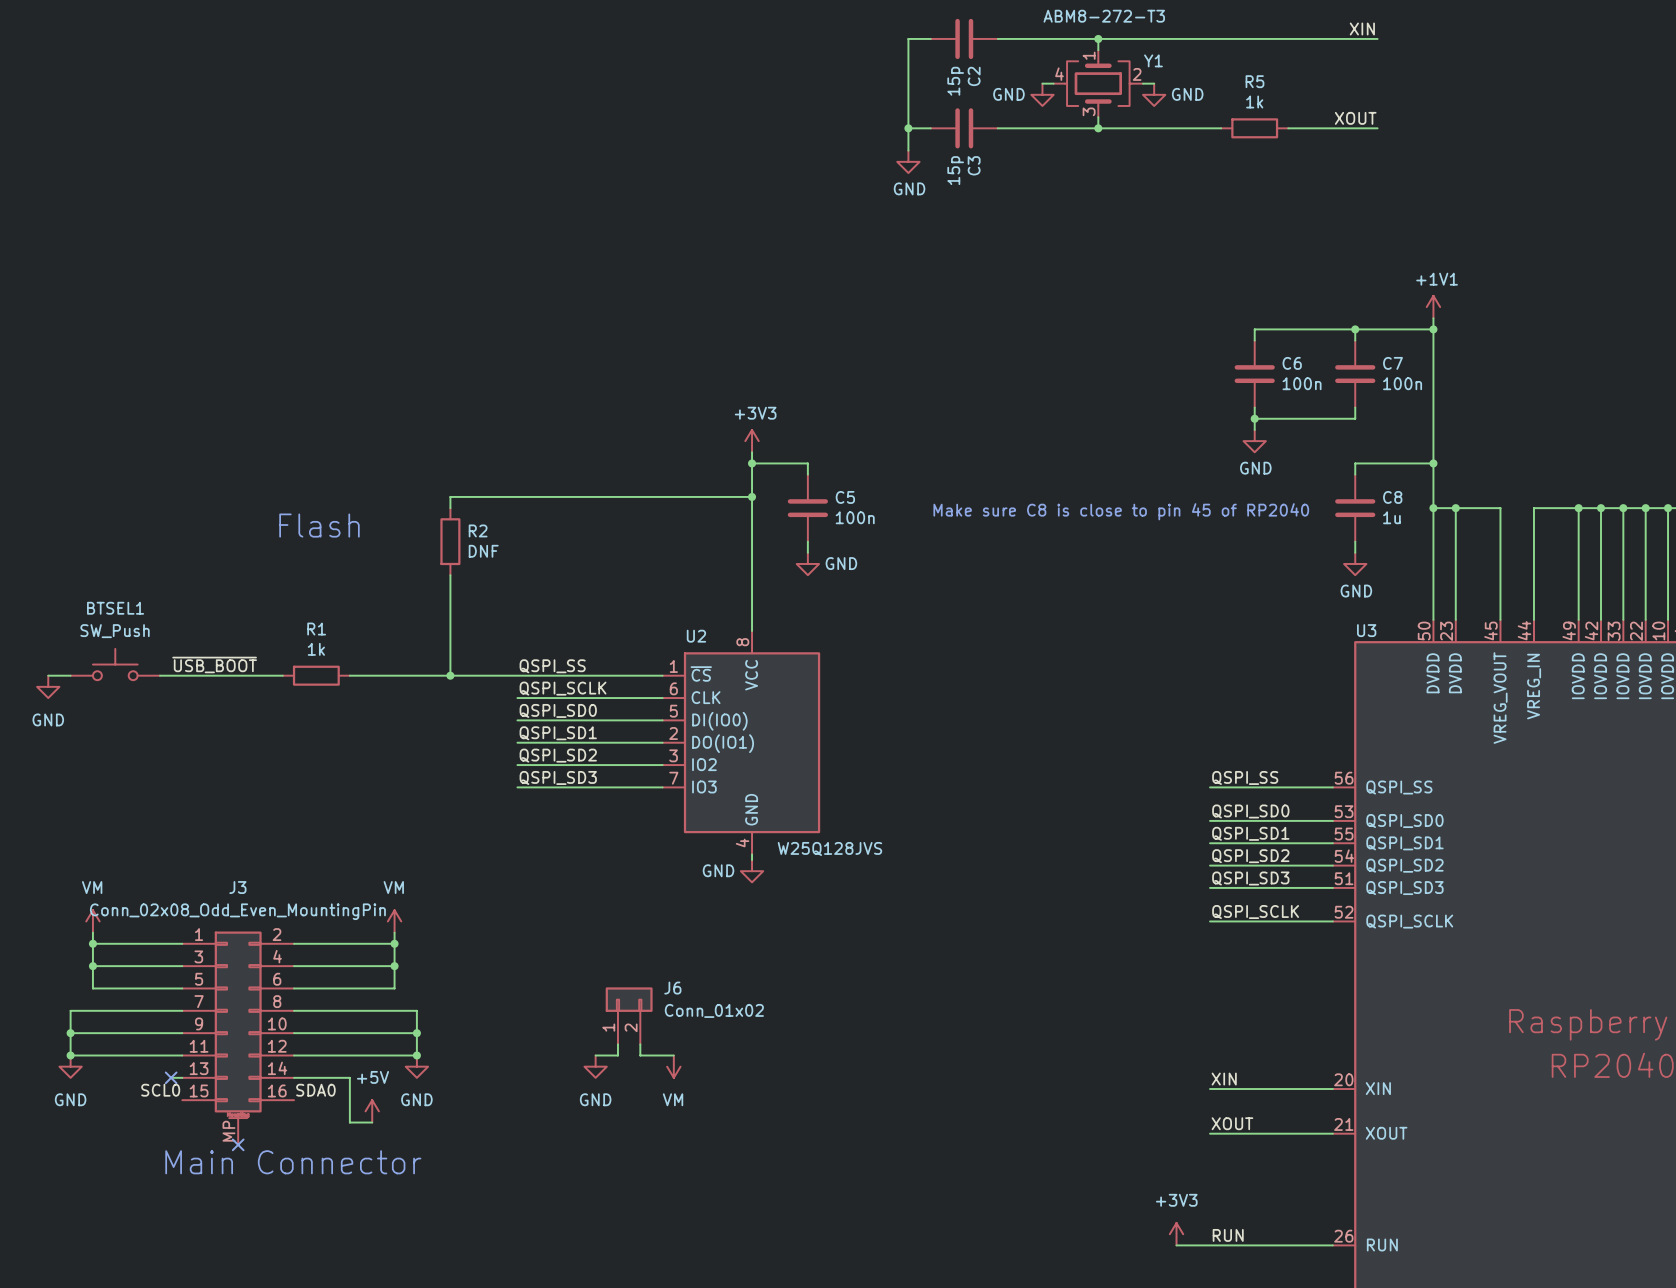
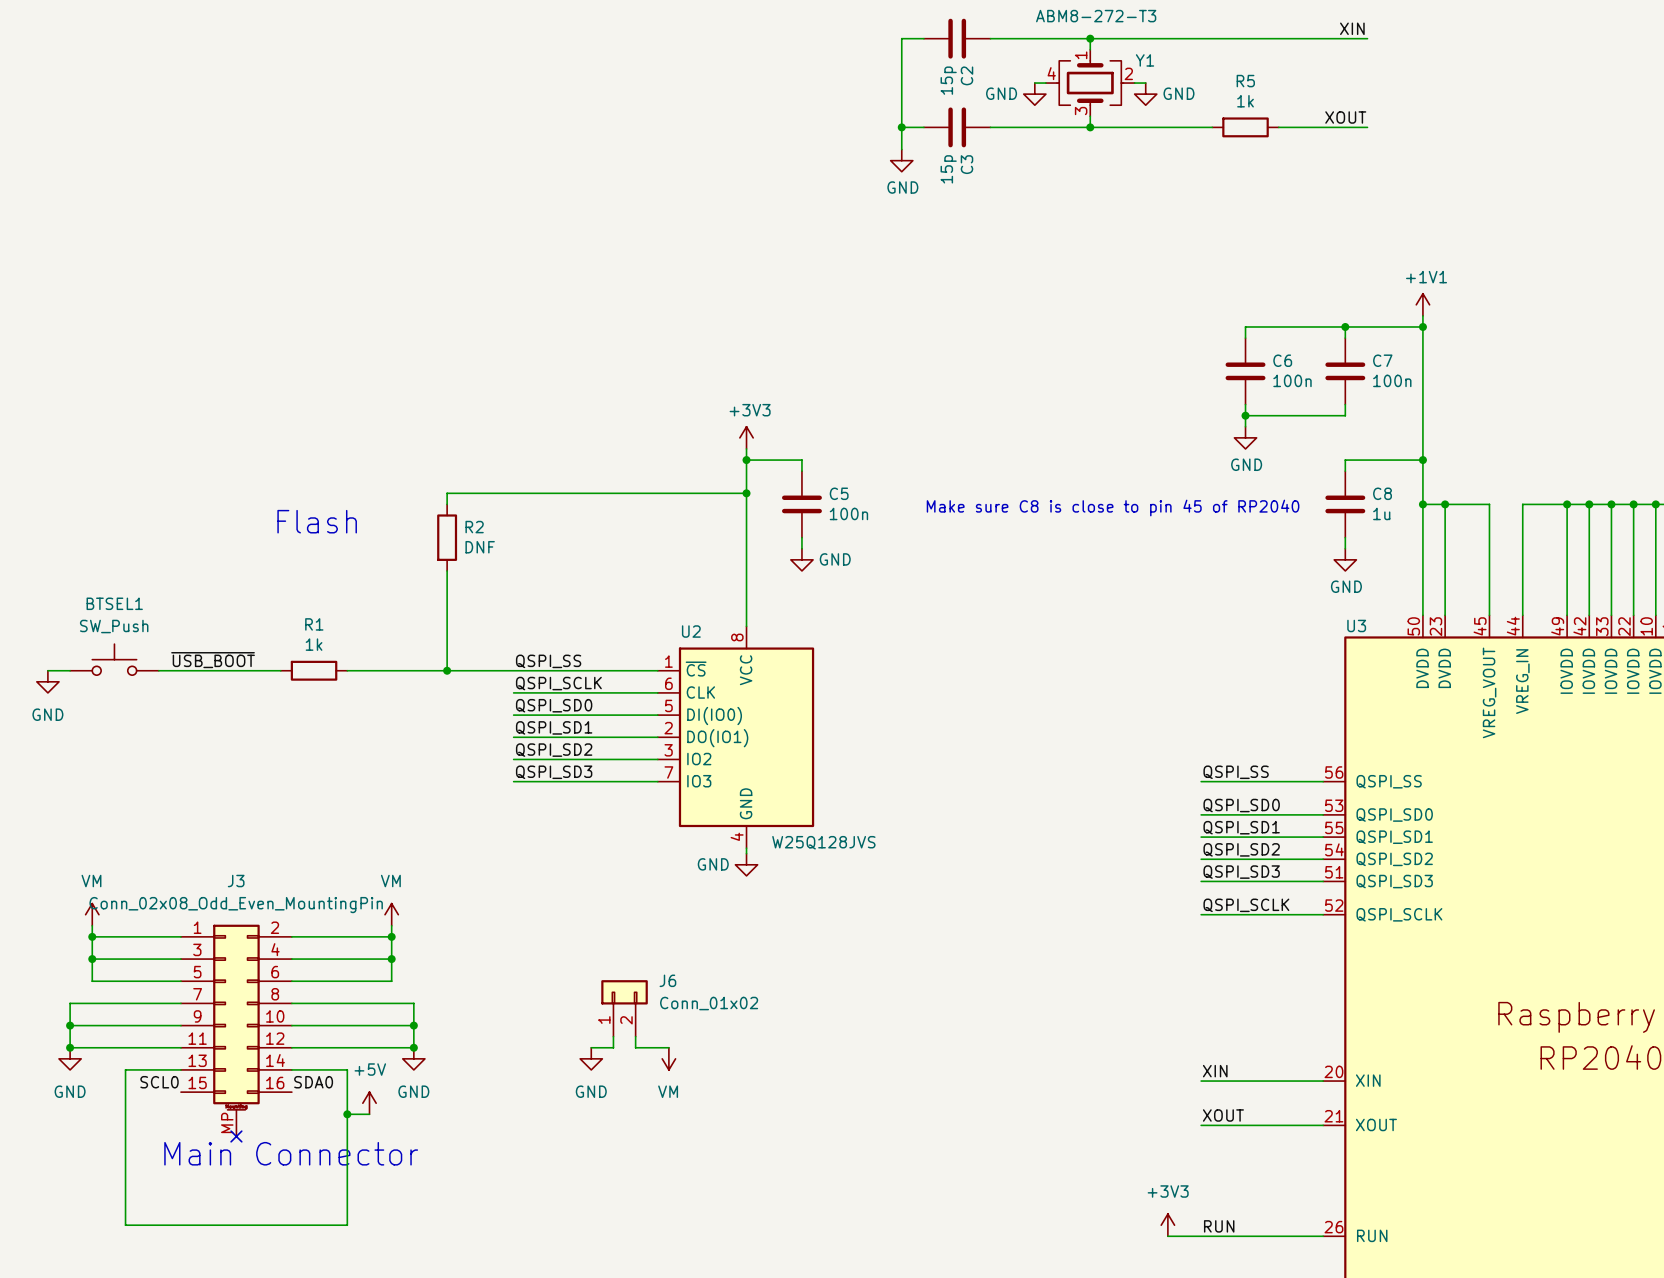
wire: none -> (169, 1069) (125, 1069) (125, 1225) (347, 1225) (347, 1114)
no-connect mark: (171, 1077) -> none
junction: none -> (347, 1114)

